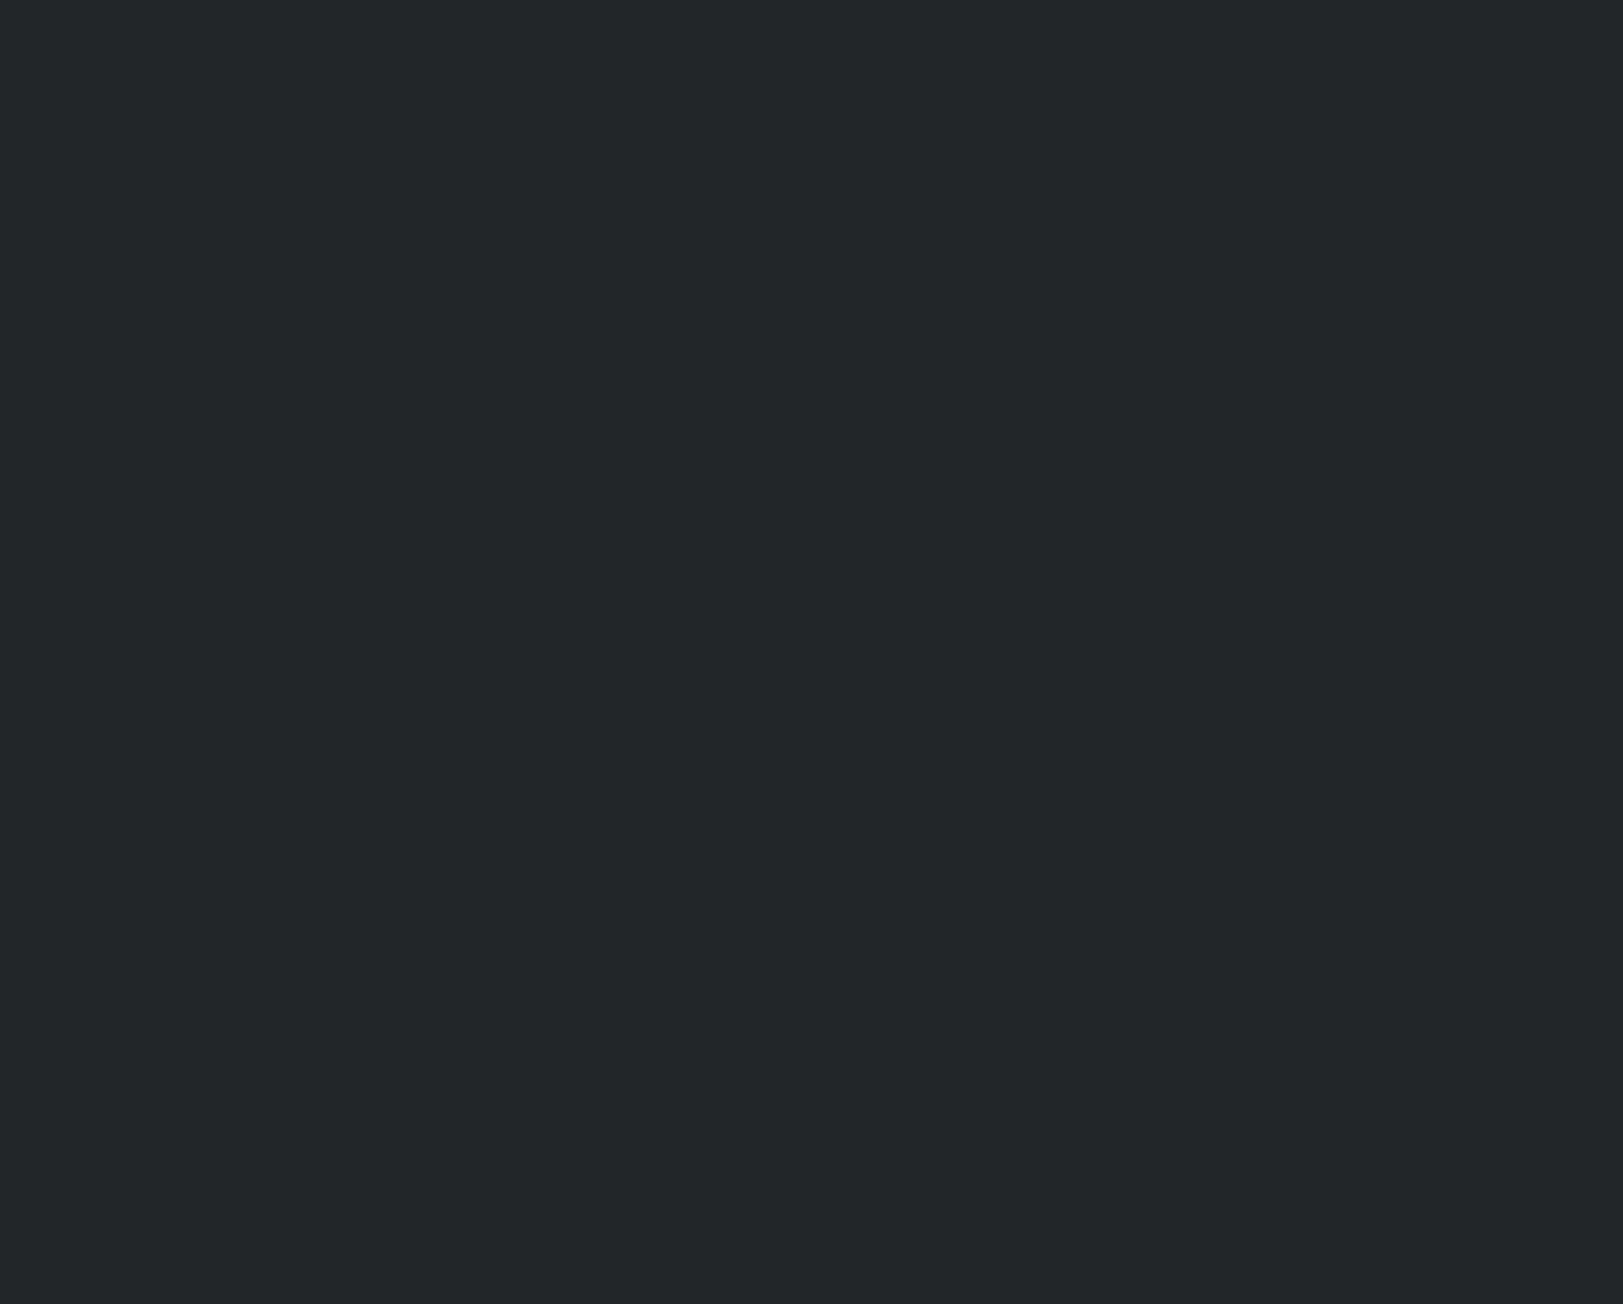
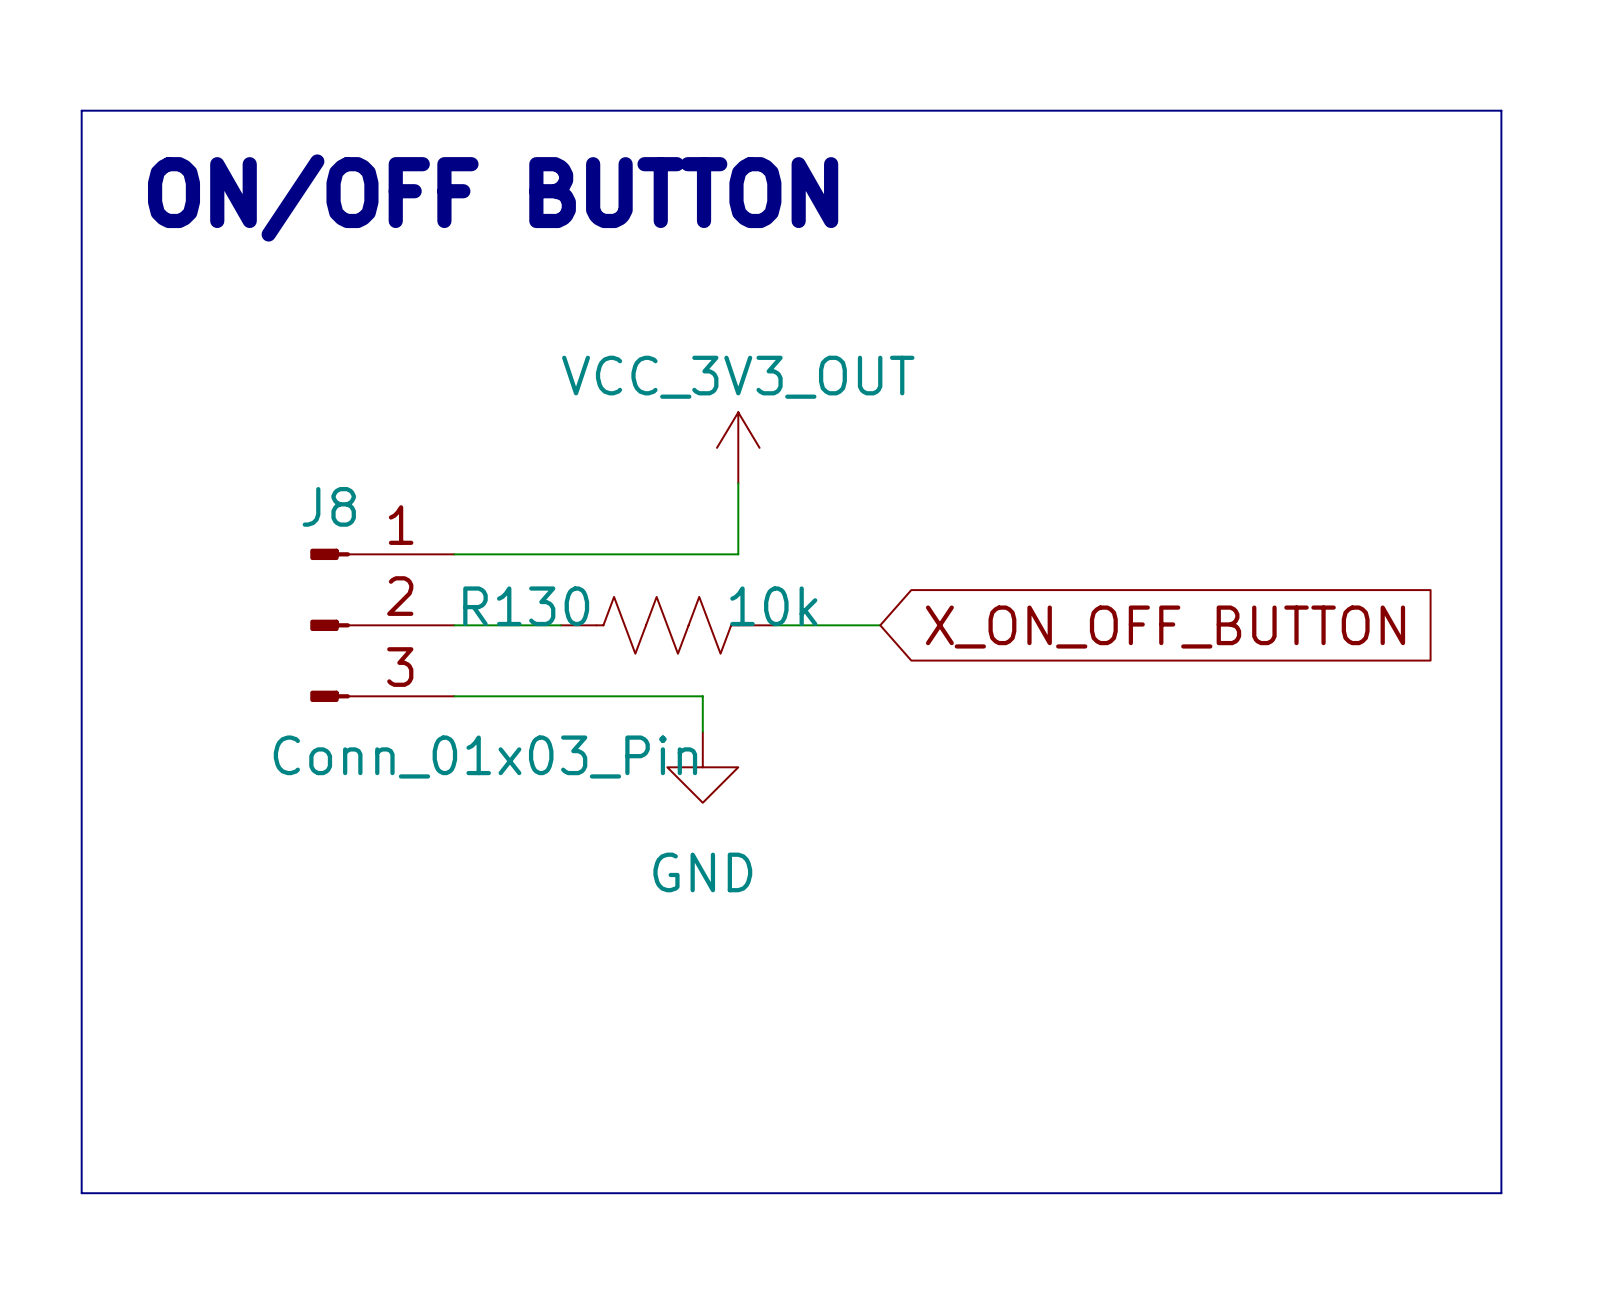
line: none -> (81, 110) (1501, 110) (1501, 1193) (81, 1193) (81, 110)
text: none -> ON/OFF BUTTON (493, 197)
power symbol: none -> VCC_3V3_OUT (738, 447)
wire: none -> (738, 483) (738, 554) (454, 554)
J8: none -> Conn_01x03_Pin (382, 625)
wire: none -> (454, 625) (560, 625)
R130: none -> 10k (667, 625)
wire: none -> (773, 625) (880, 625)
global label: none -> X_ON_OFF_BUTTON (1165, 627)
wire: none -> (454, 696) (702, 696) (702, 731)
power symbol: none -> GND (702, 767)

